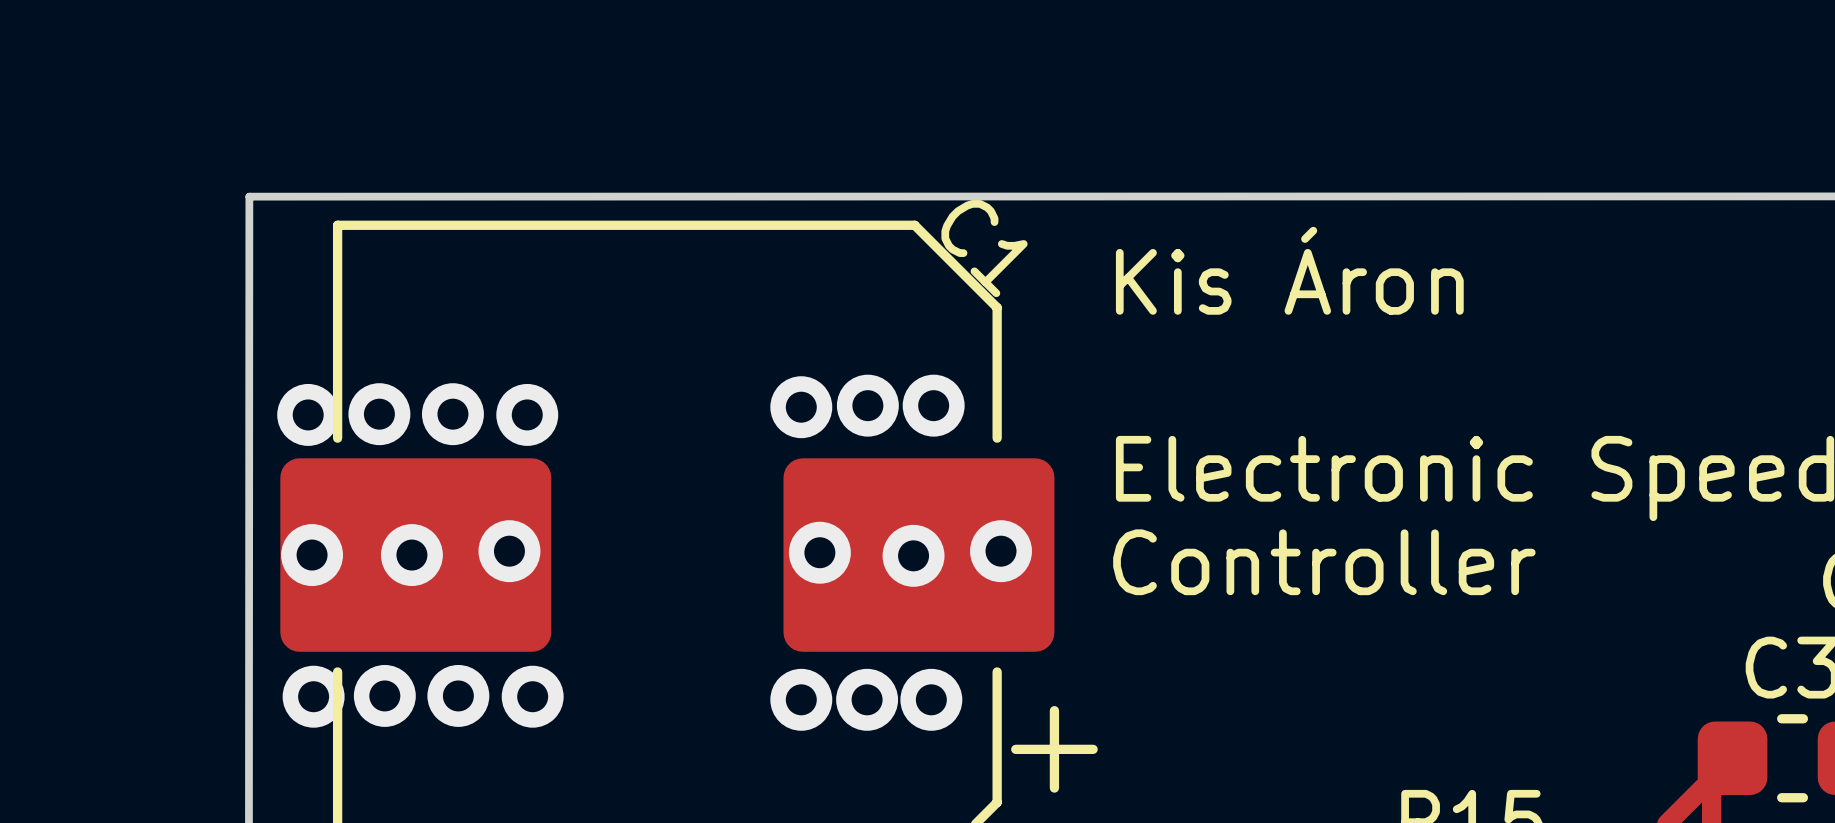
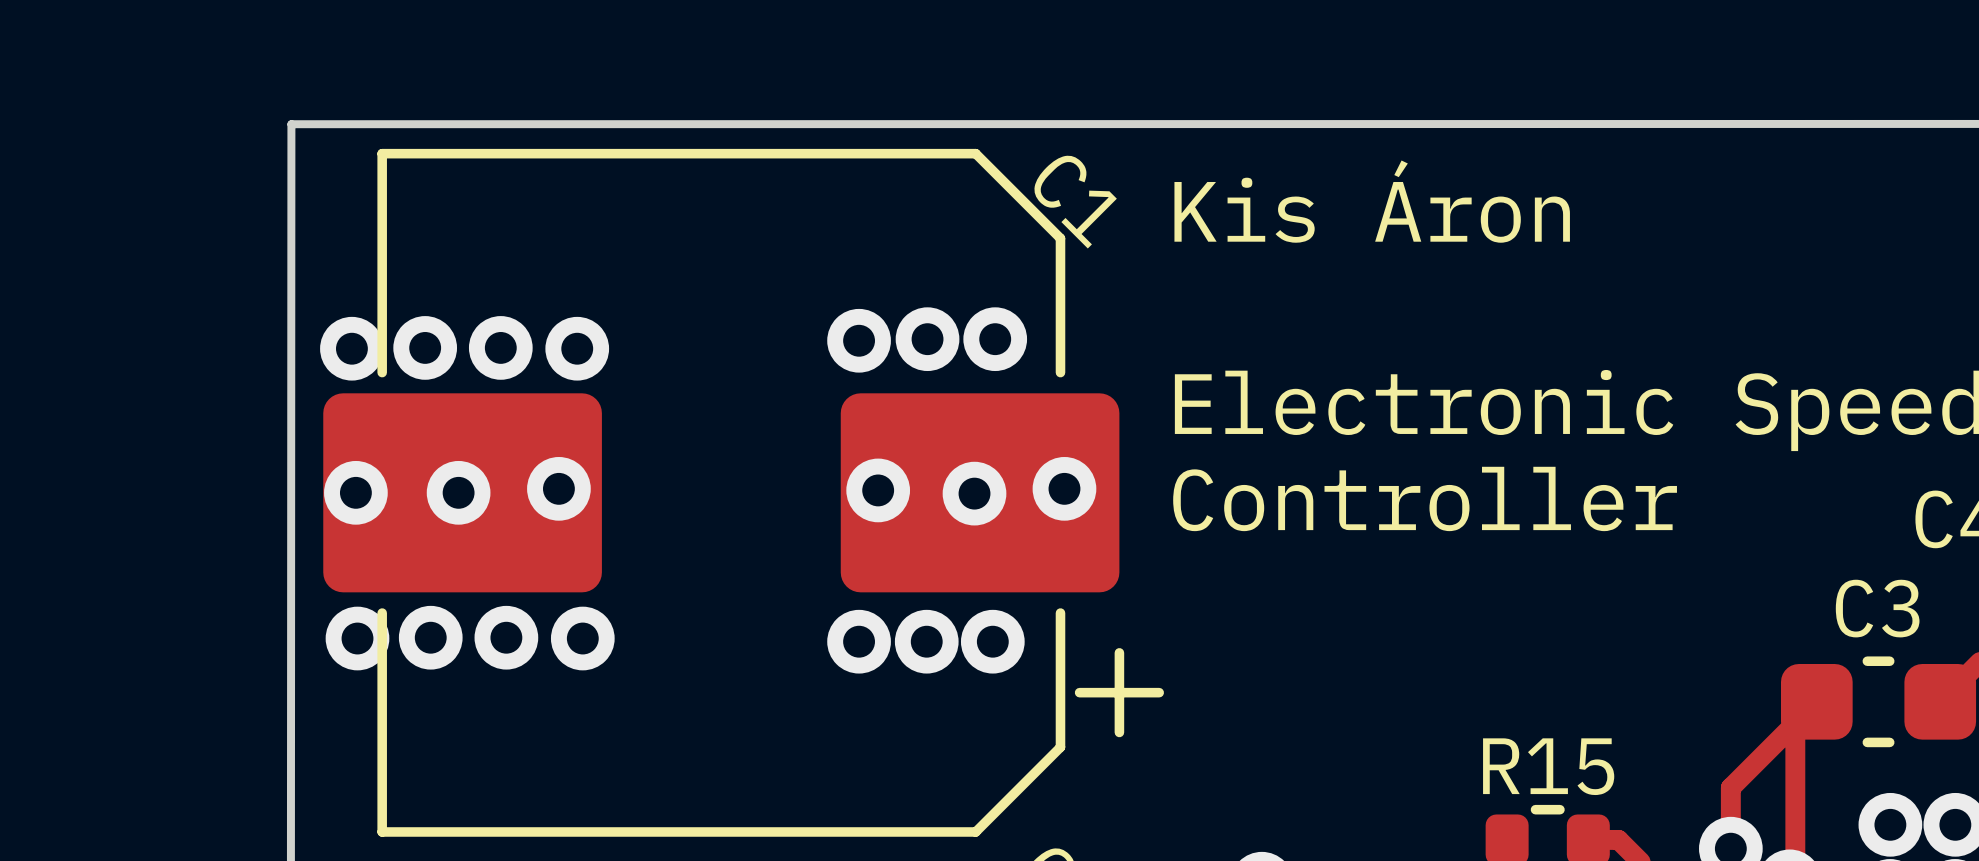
C1 name position: C1 (984, 248) -> C1 (1074, 201)

